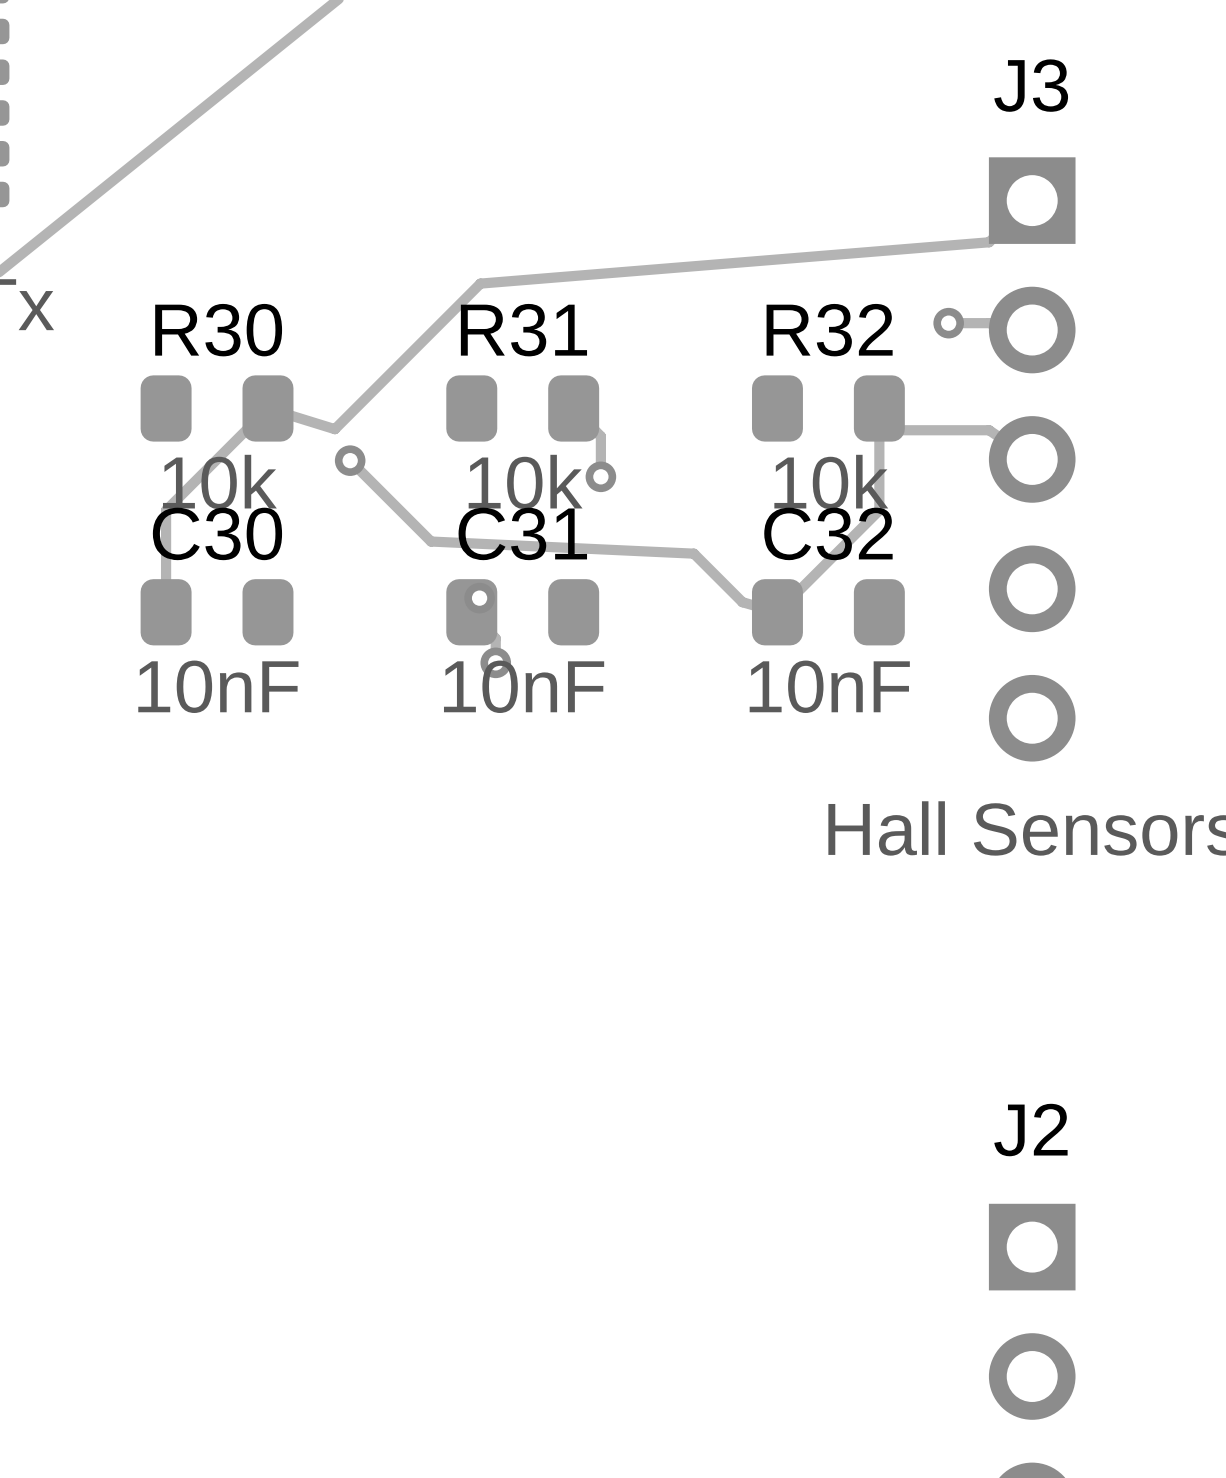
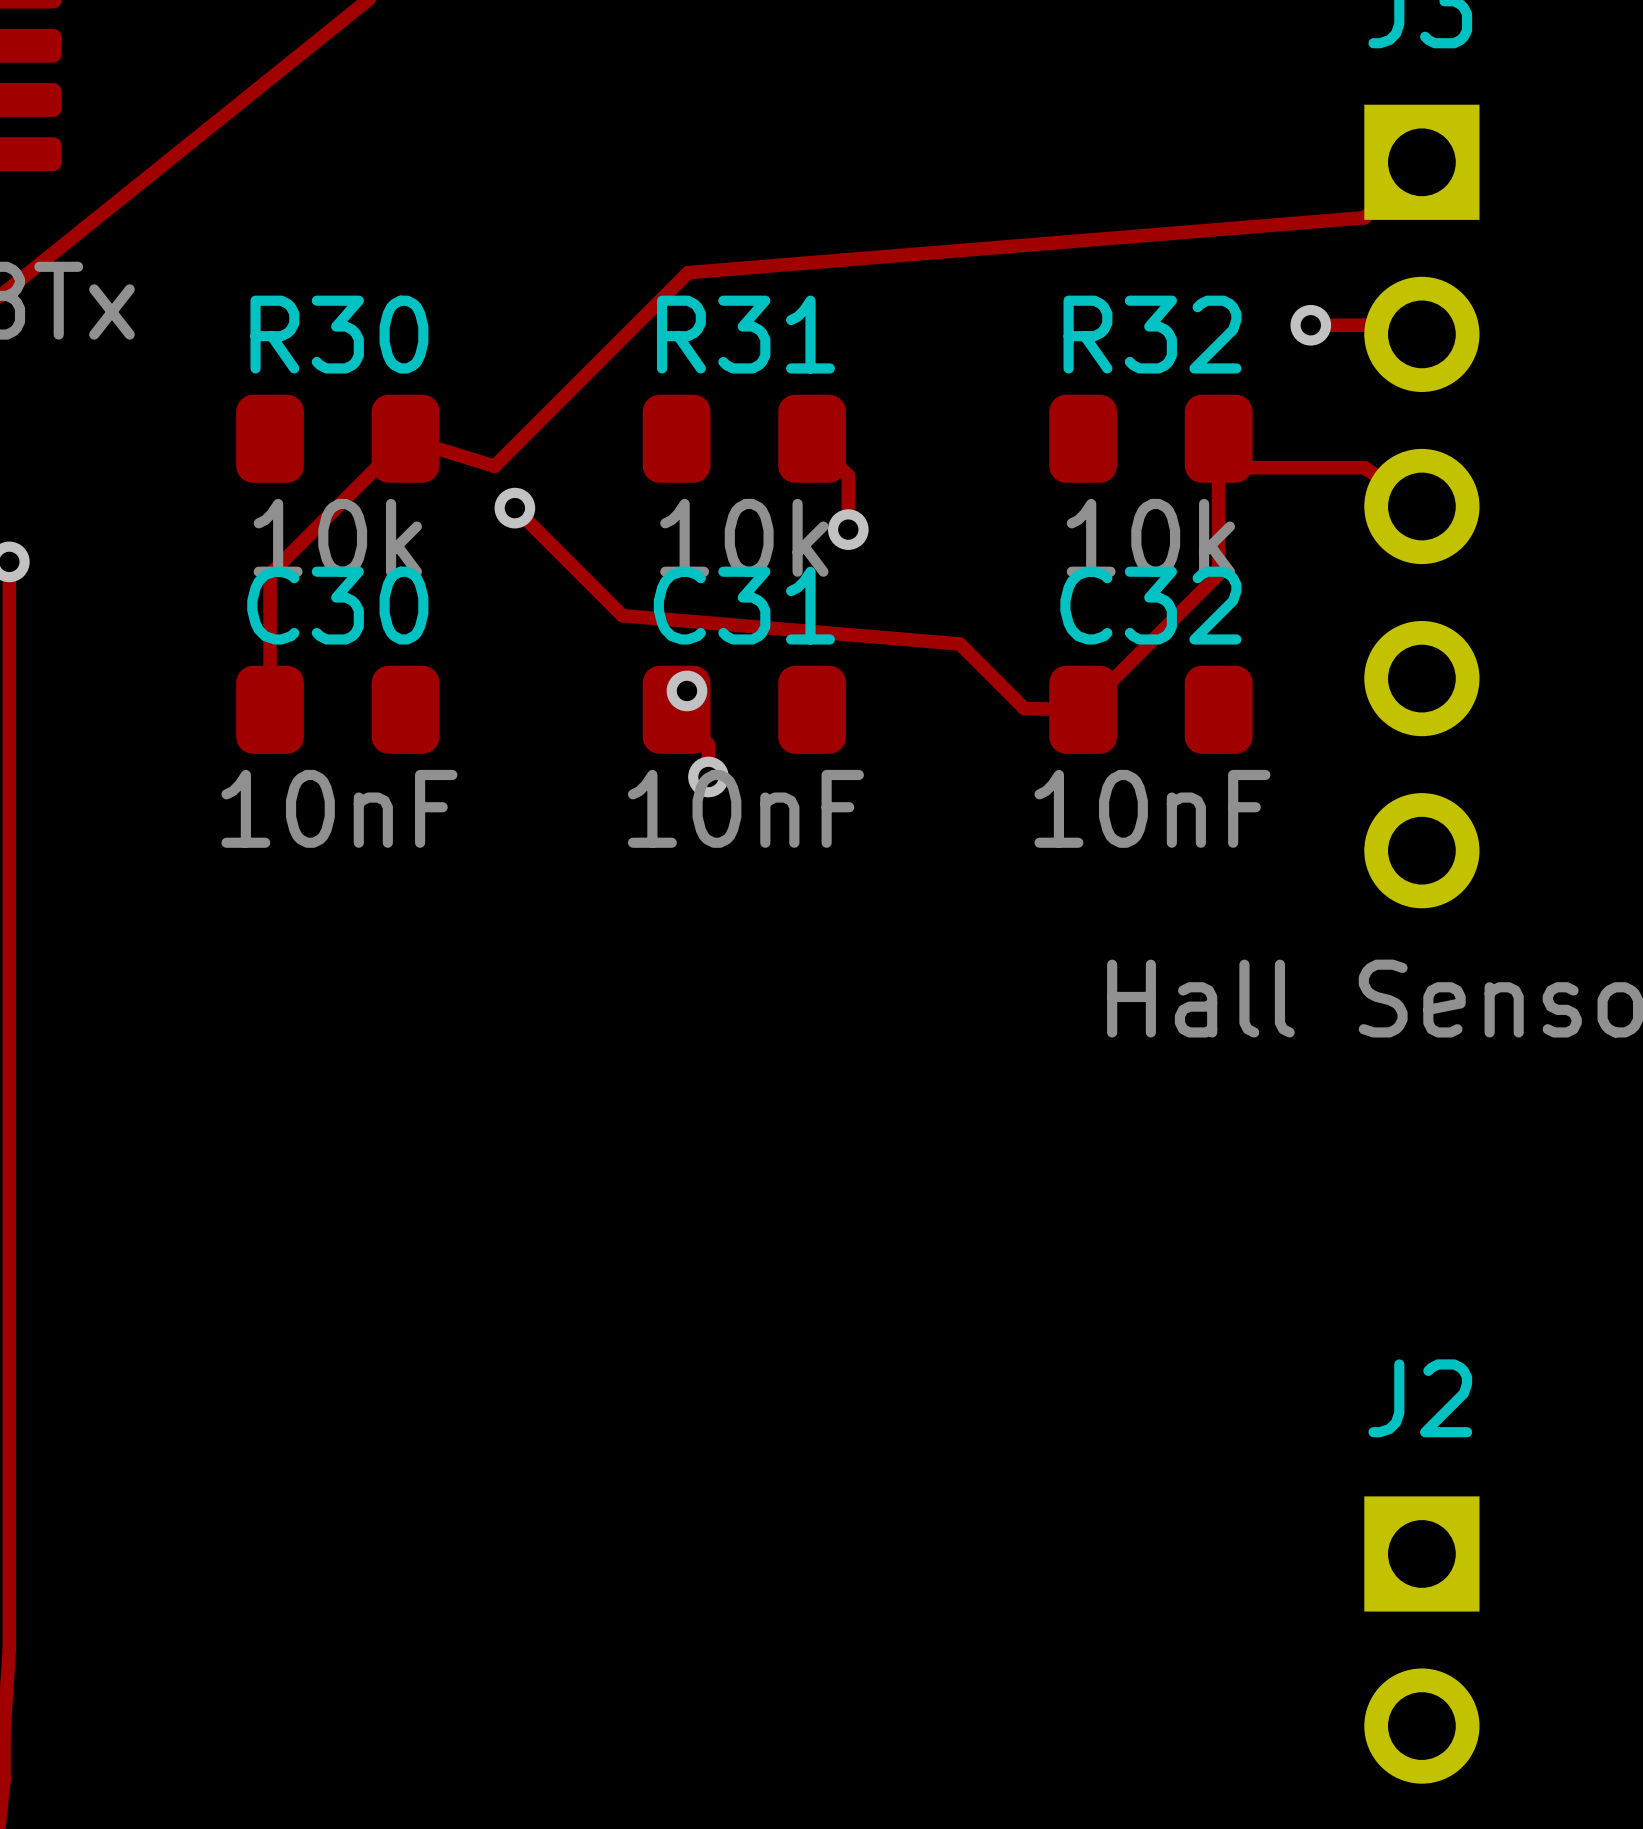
track: (431, 541) (693, 553) (742, 602) (777, 612) -> (622, 615) (959, 643) (1024, 708) (1083, 709)

